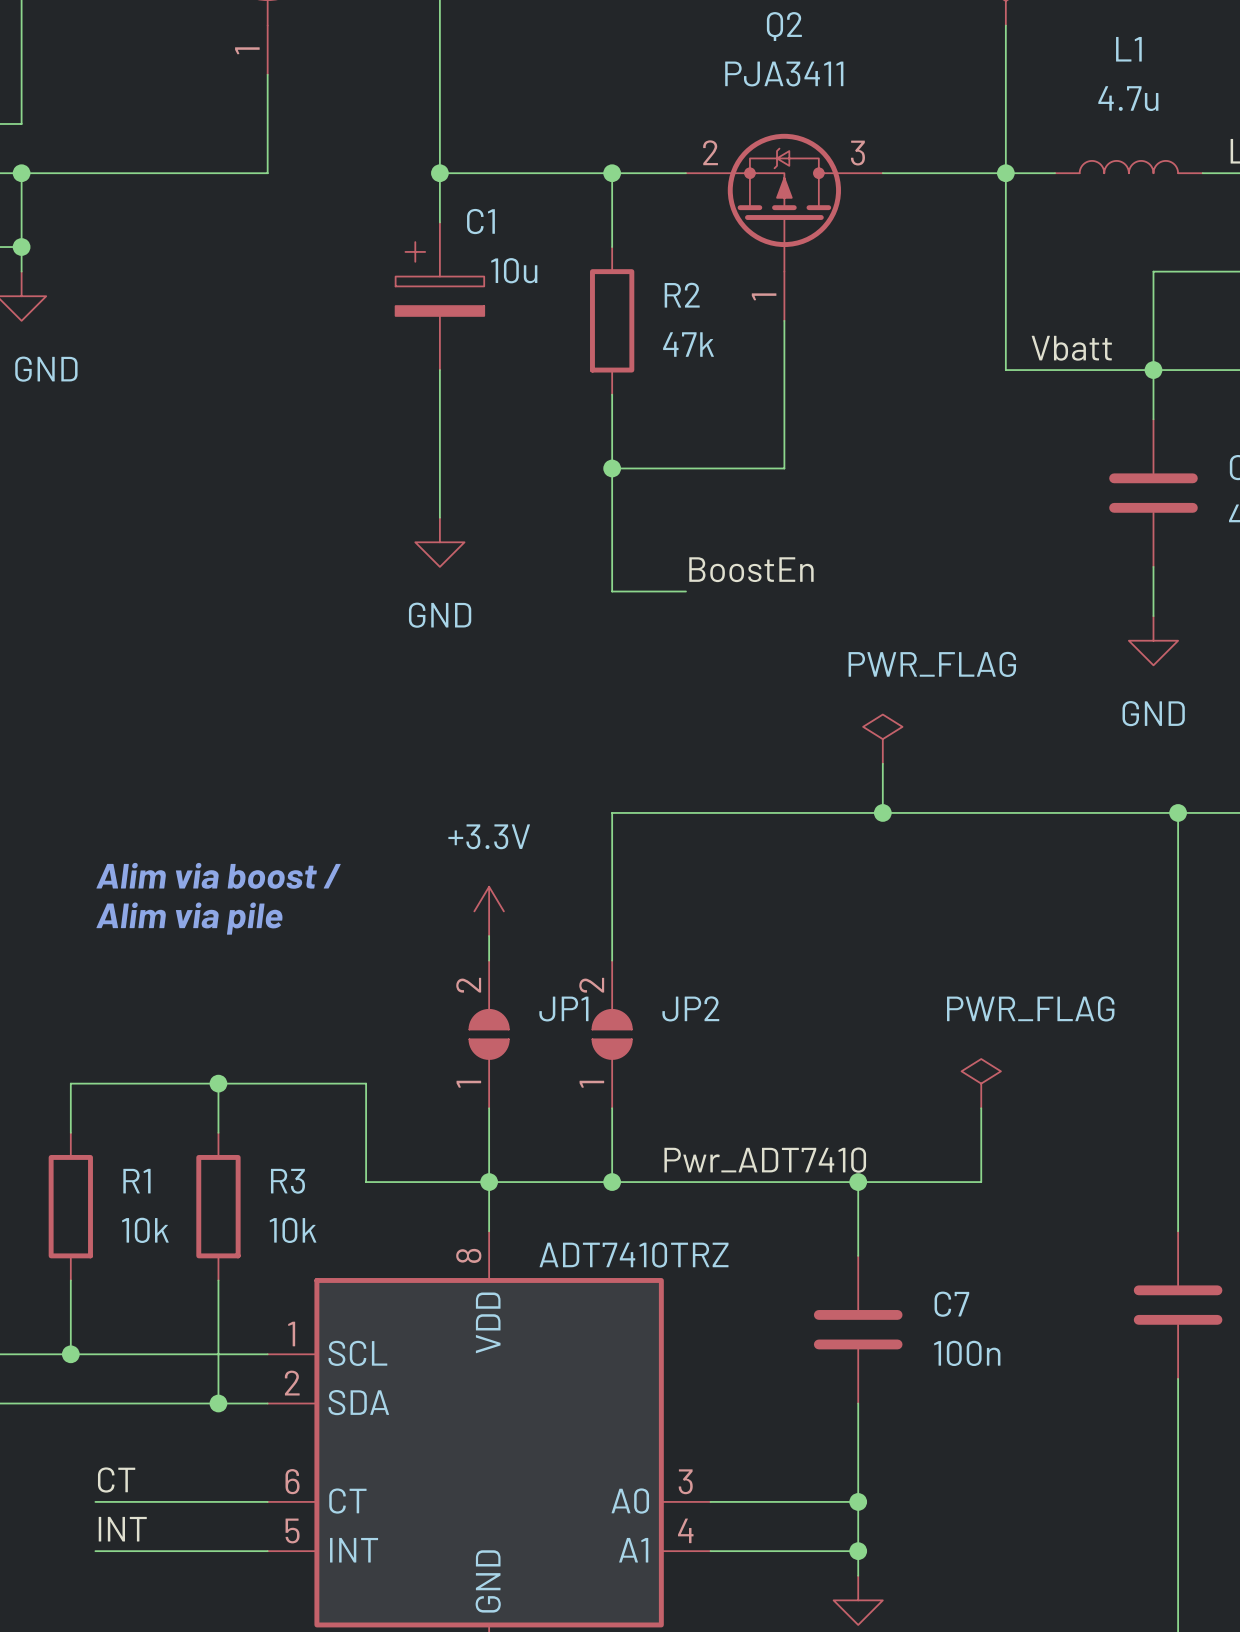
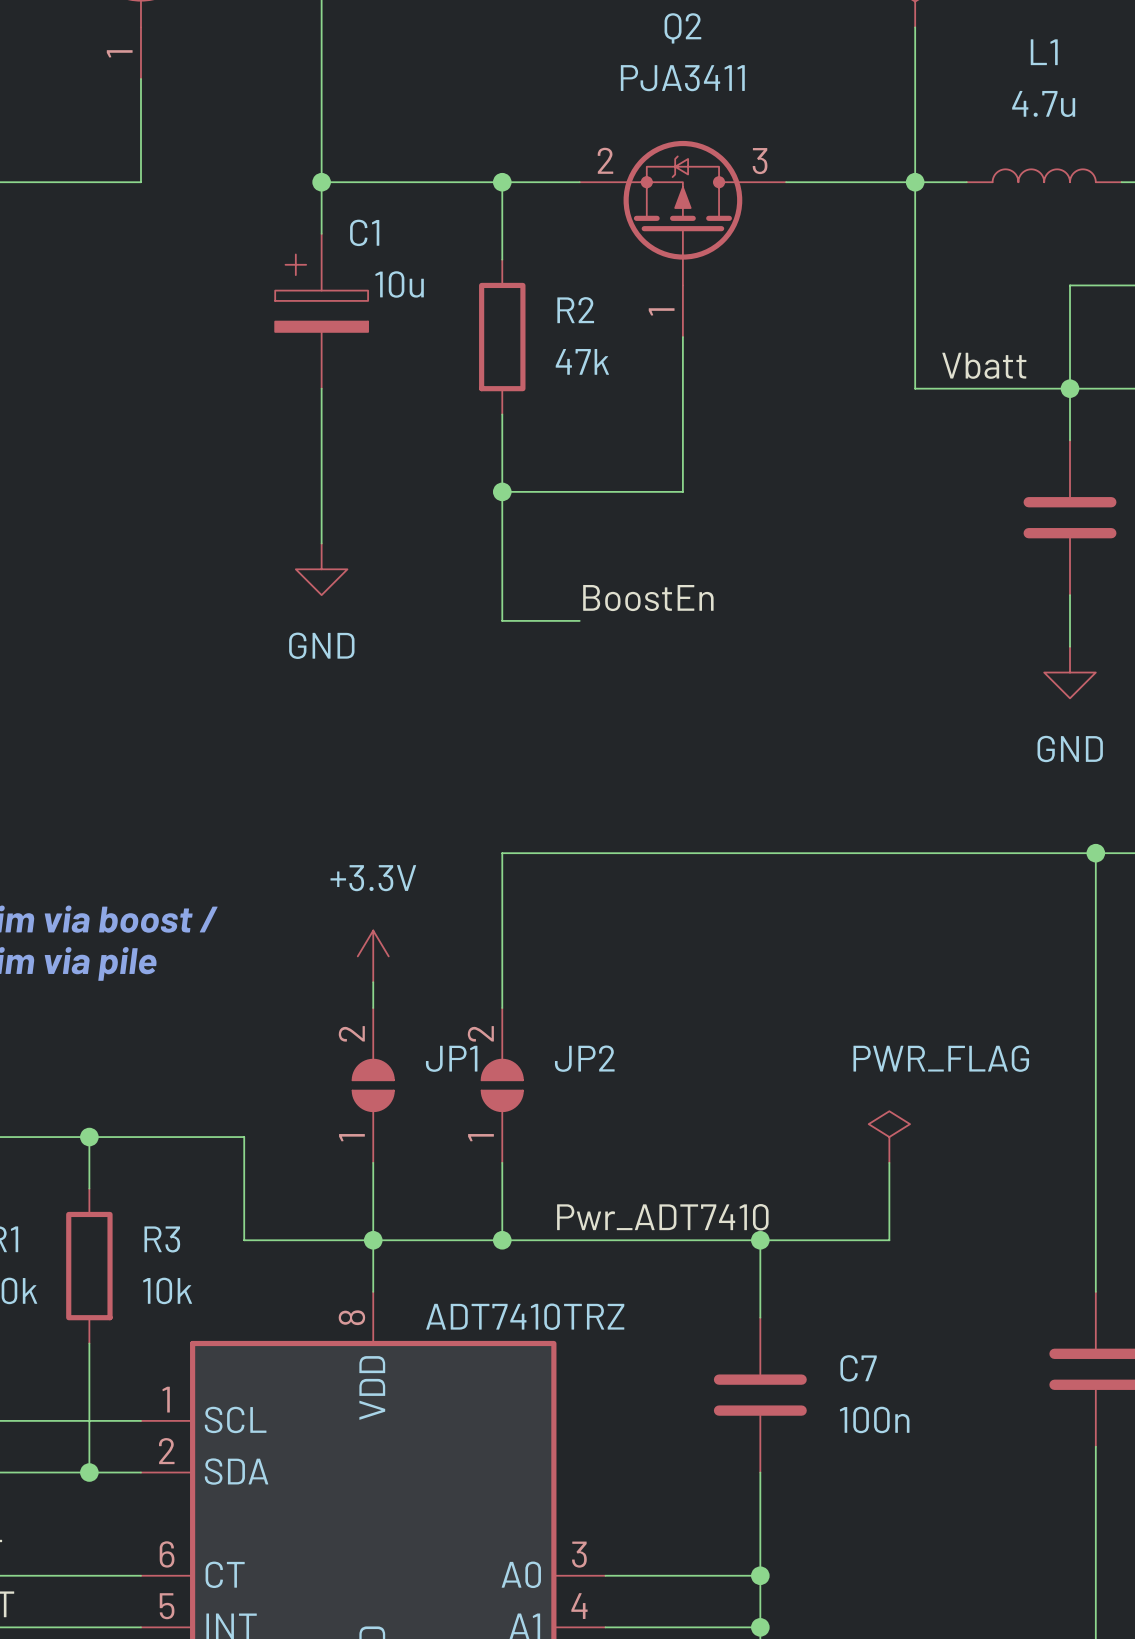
power symbol: PWR_FLAG (882, 739) -> none
wire: (882, 763) (882, 812) -> none
junction: (882, 812) -> none

